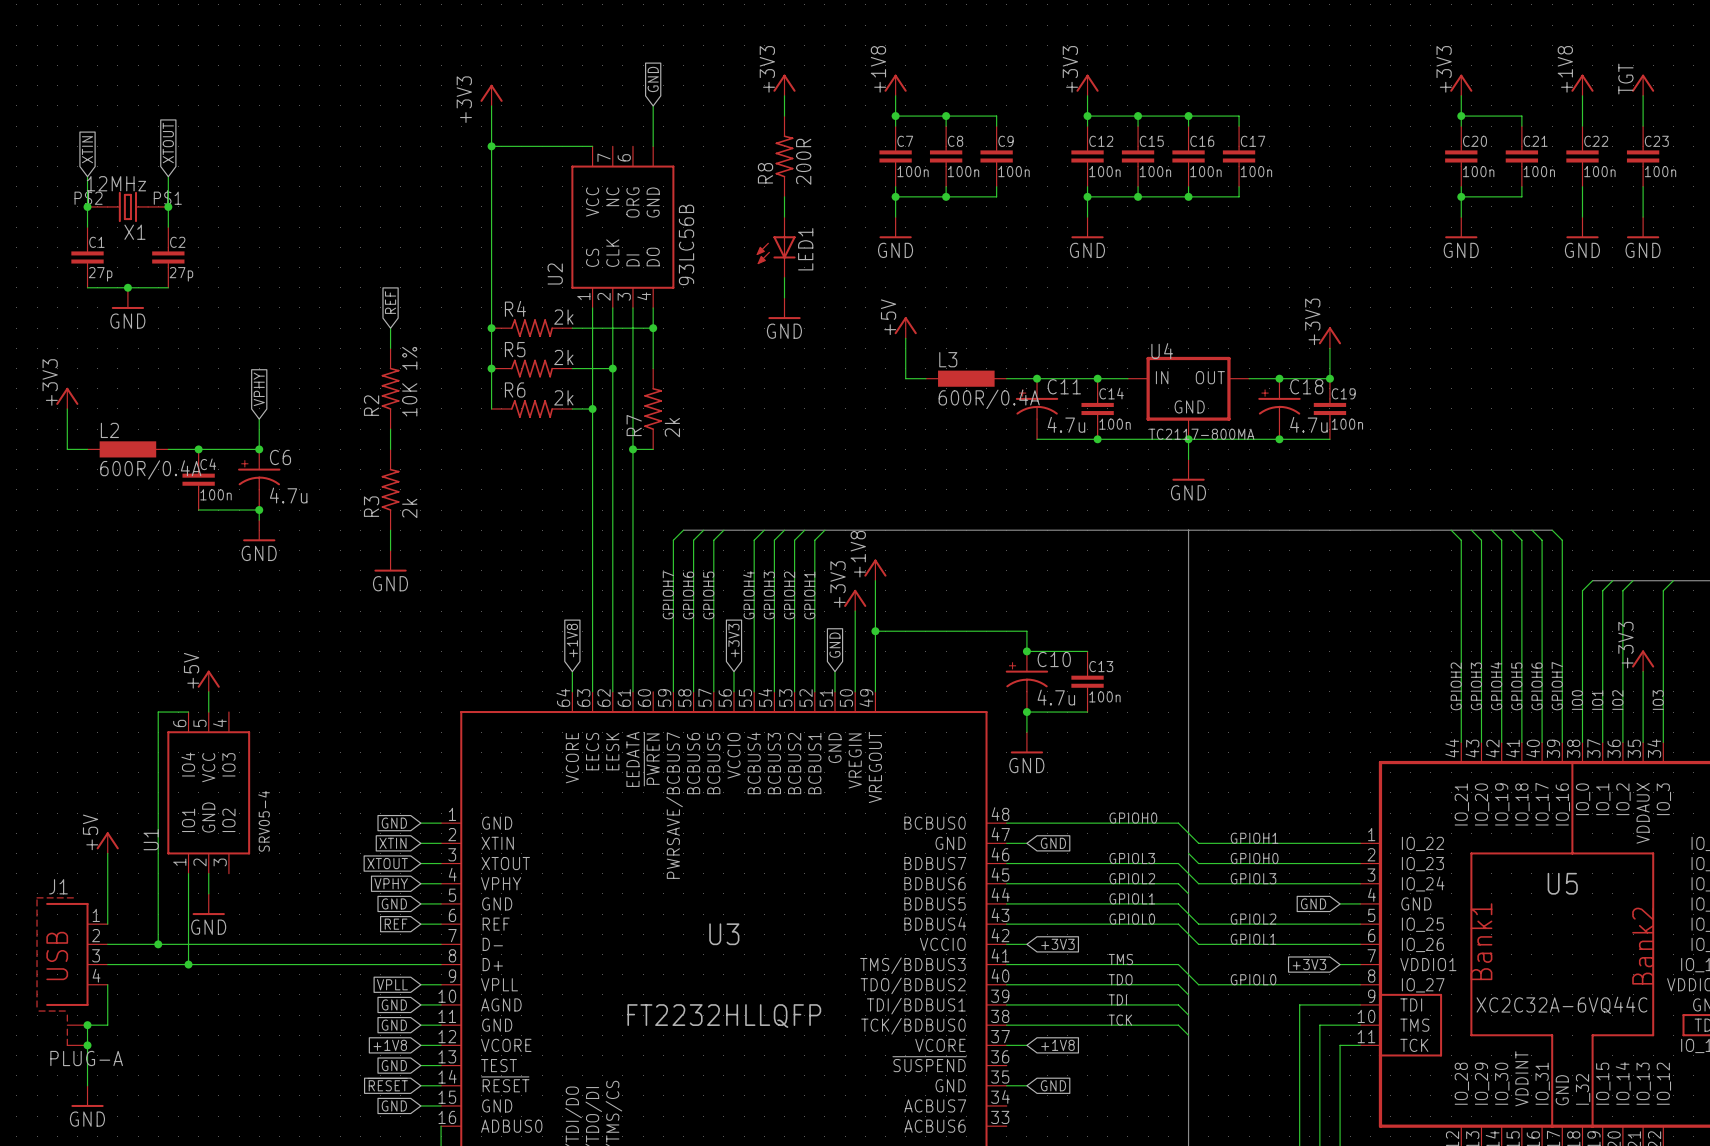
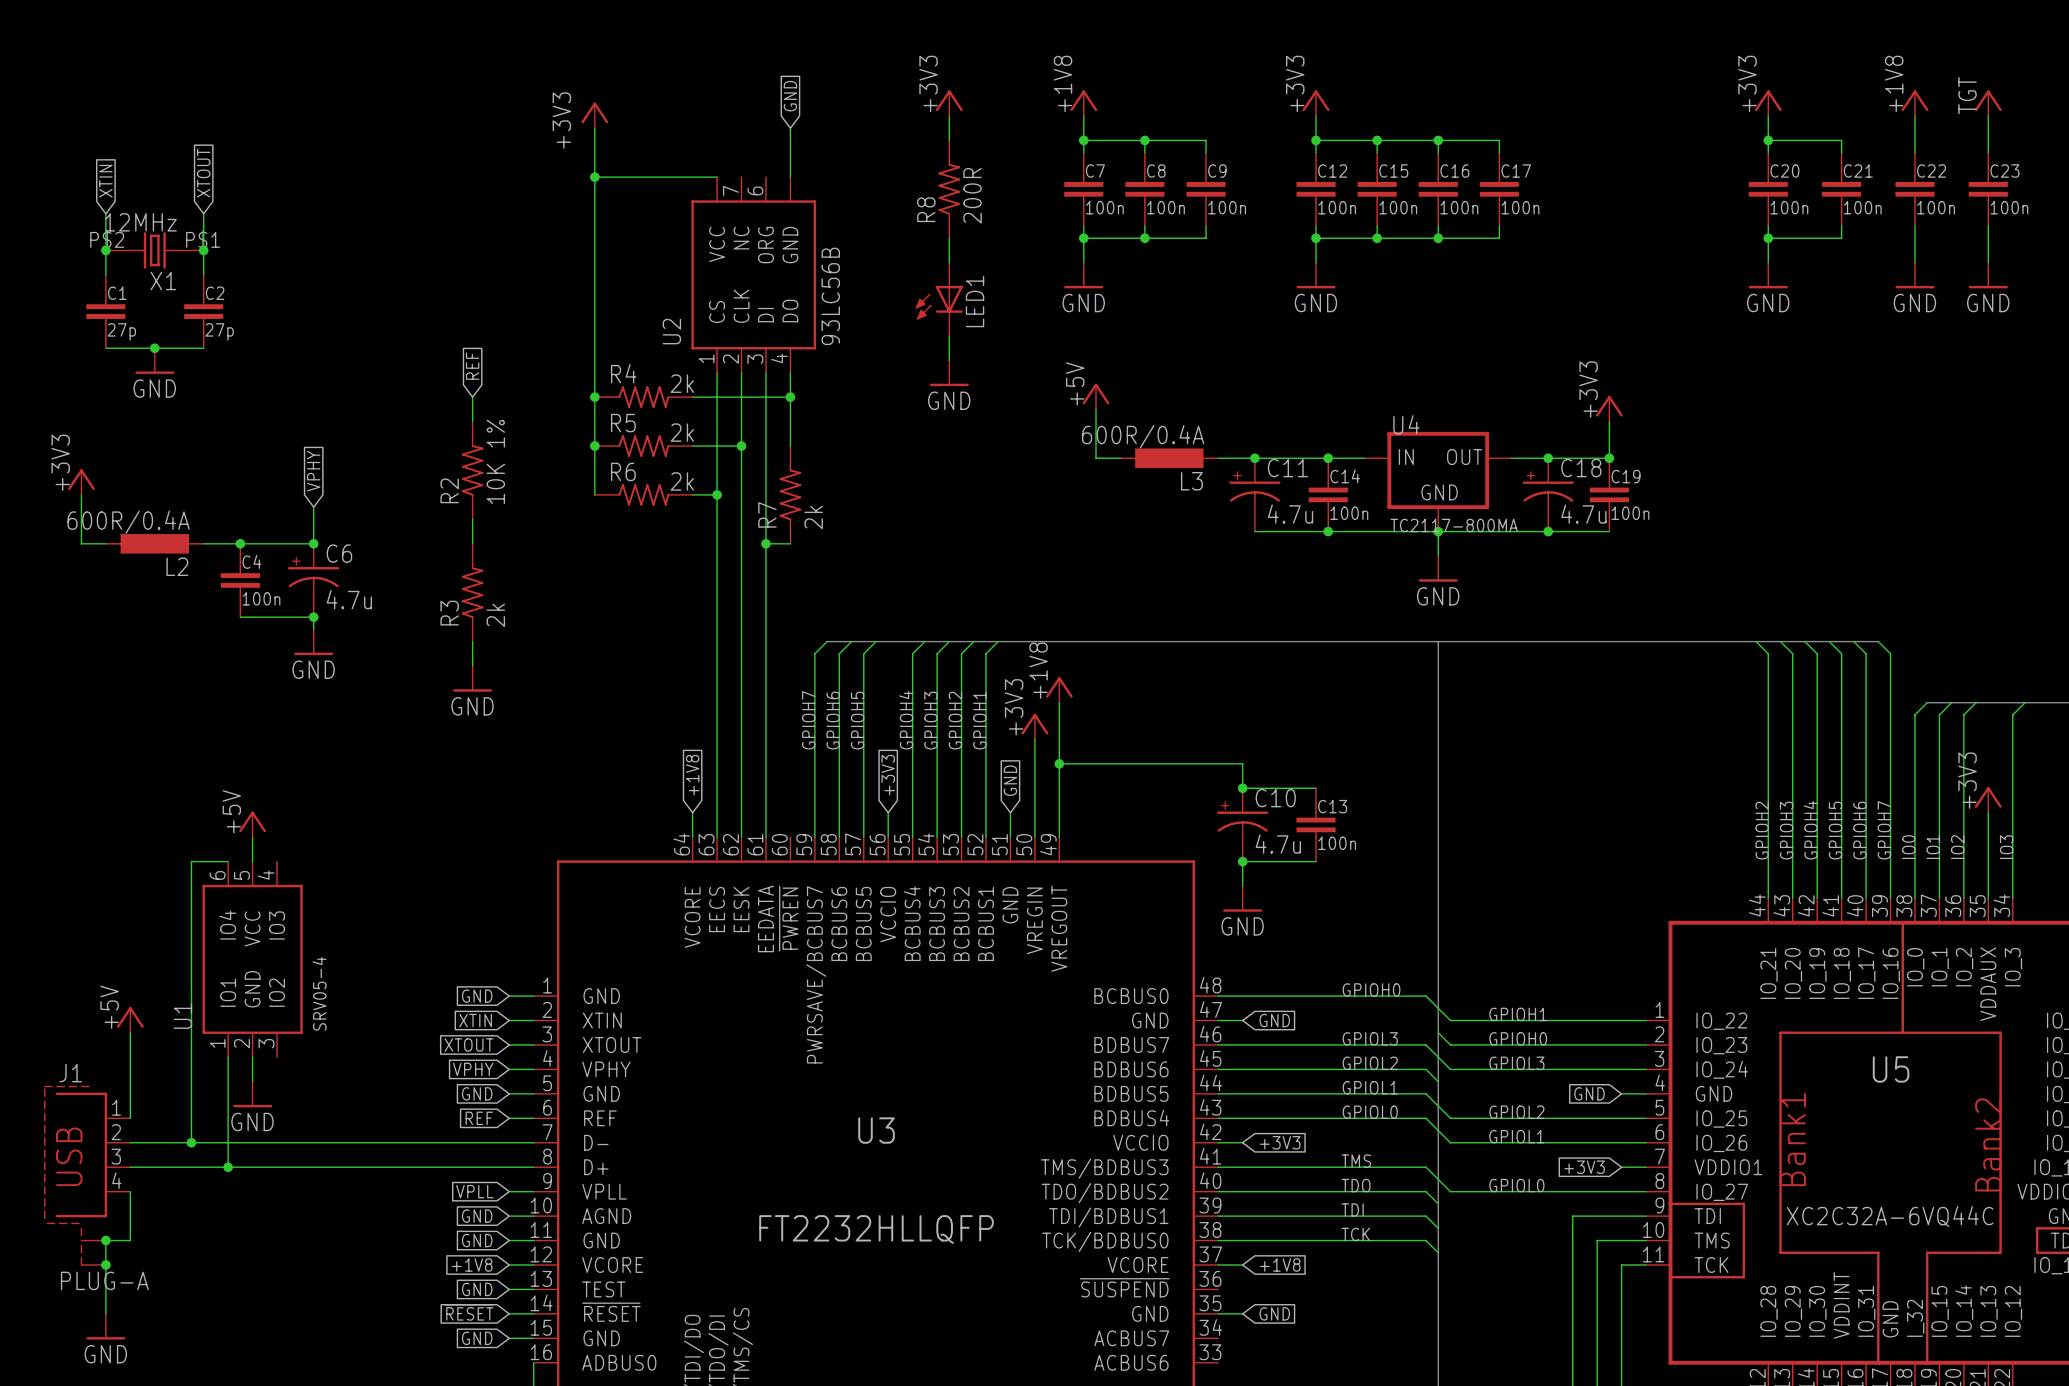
L3 name position: L3 (948, 359) -> L3 (1191, 481)
L3 value position: 600R/0.4A (989, 399) -> 600R/0.4A (1143, 436)
L2 name position: L2 (109, 430) -> L2 (177, 566)
L2 value position: 600R/0.4A (150, 469) -> 600R/0.4A (128, 522)

